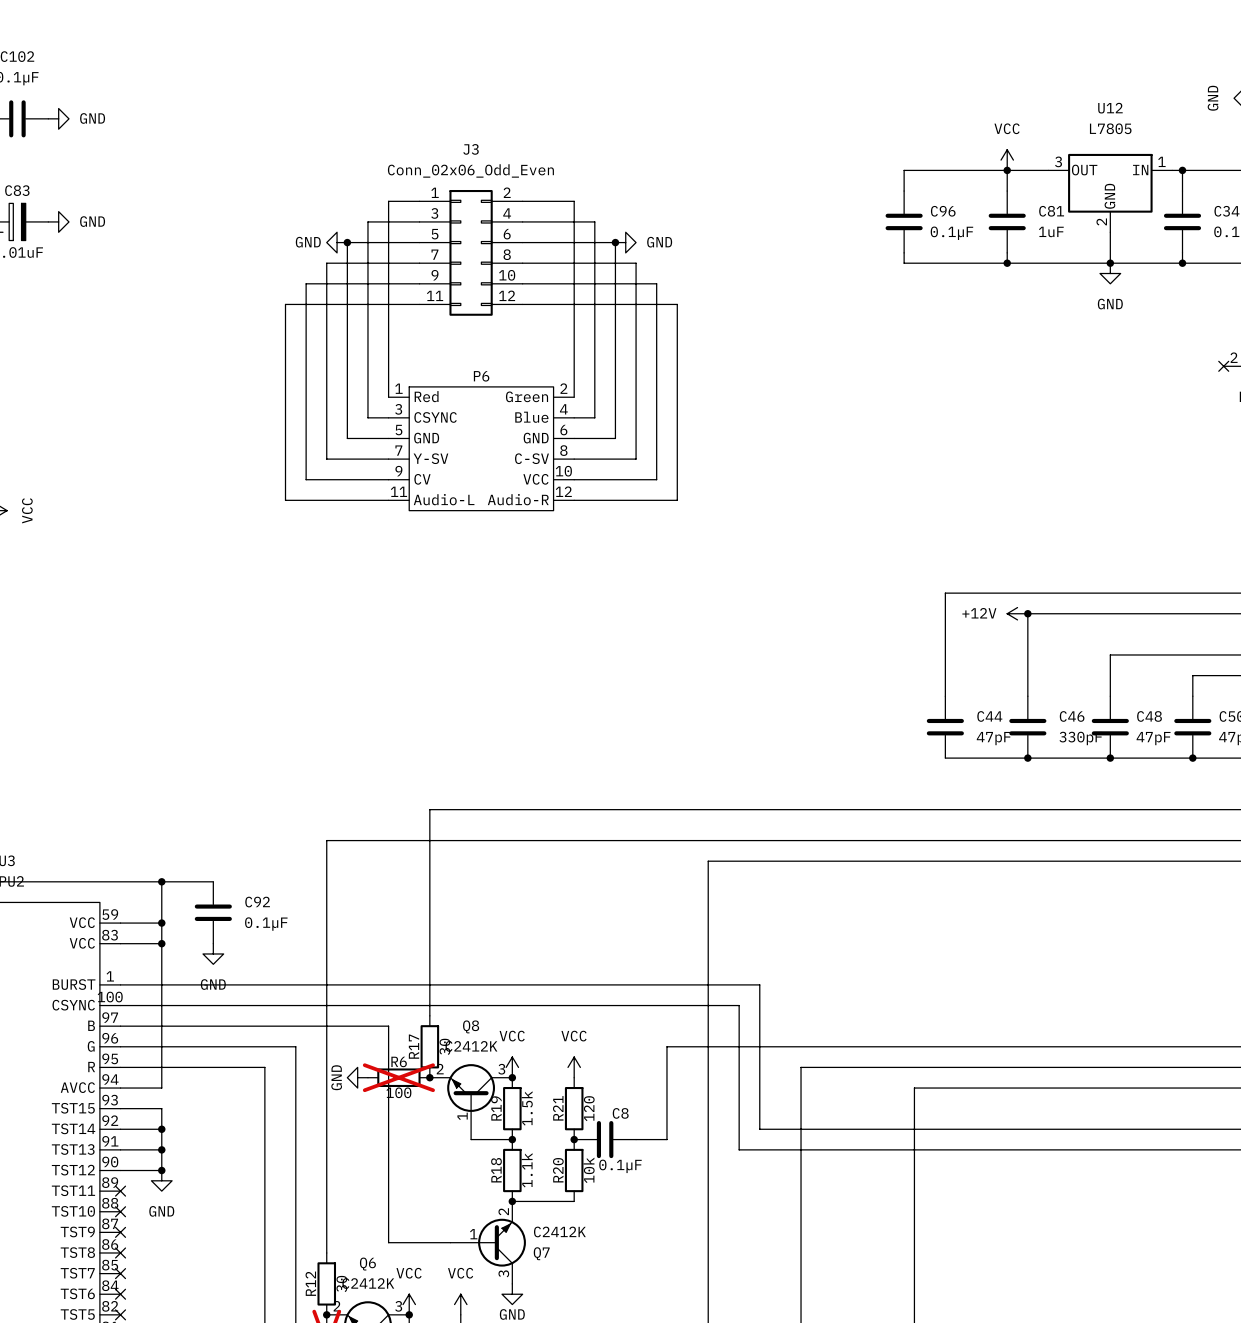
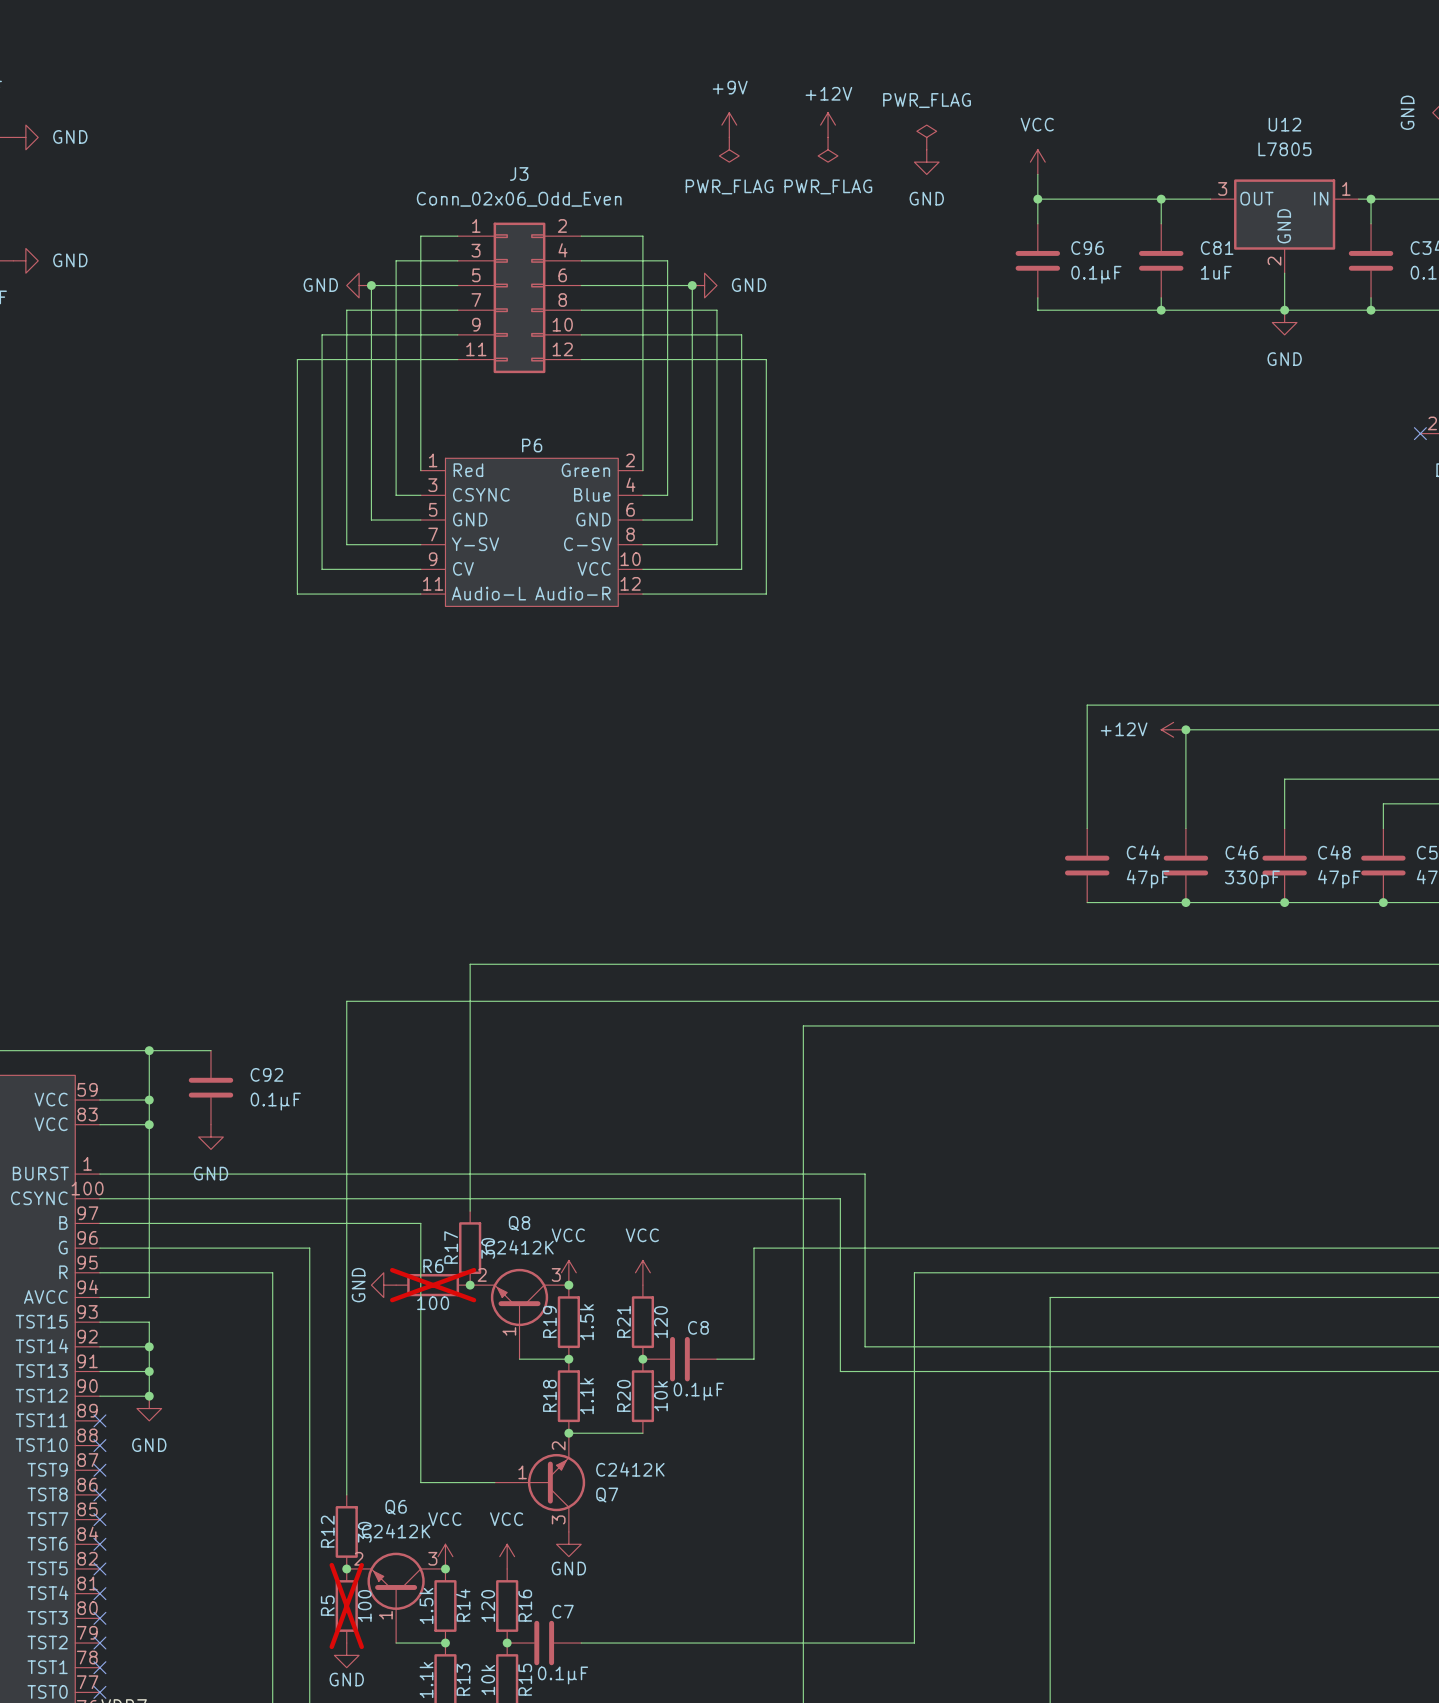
power symbol: none -> +9V (729, 125)
power symbol: none -> +12V (828, 125)
power symbol: none -> PWR_FLAG (926, 137)
power symbol: none -> PWR_FLAG (729, 149)
power symbol: none -> PWR_FLAG (828, 149)
power symbol: none -> GND (926, 162)
wire: none -> (1037, 174) (1037, 199)
power symbol position: VCC (1007, 160) -> VCC (1037, 162)
junction: none -> (1037, 199)

